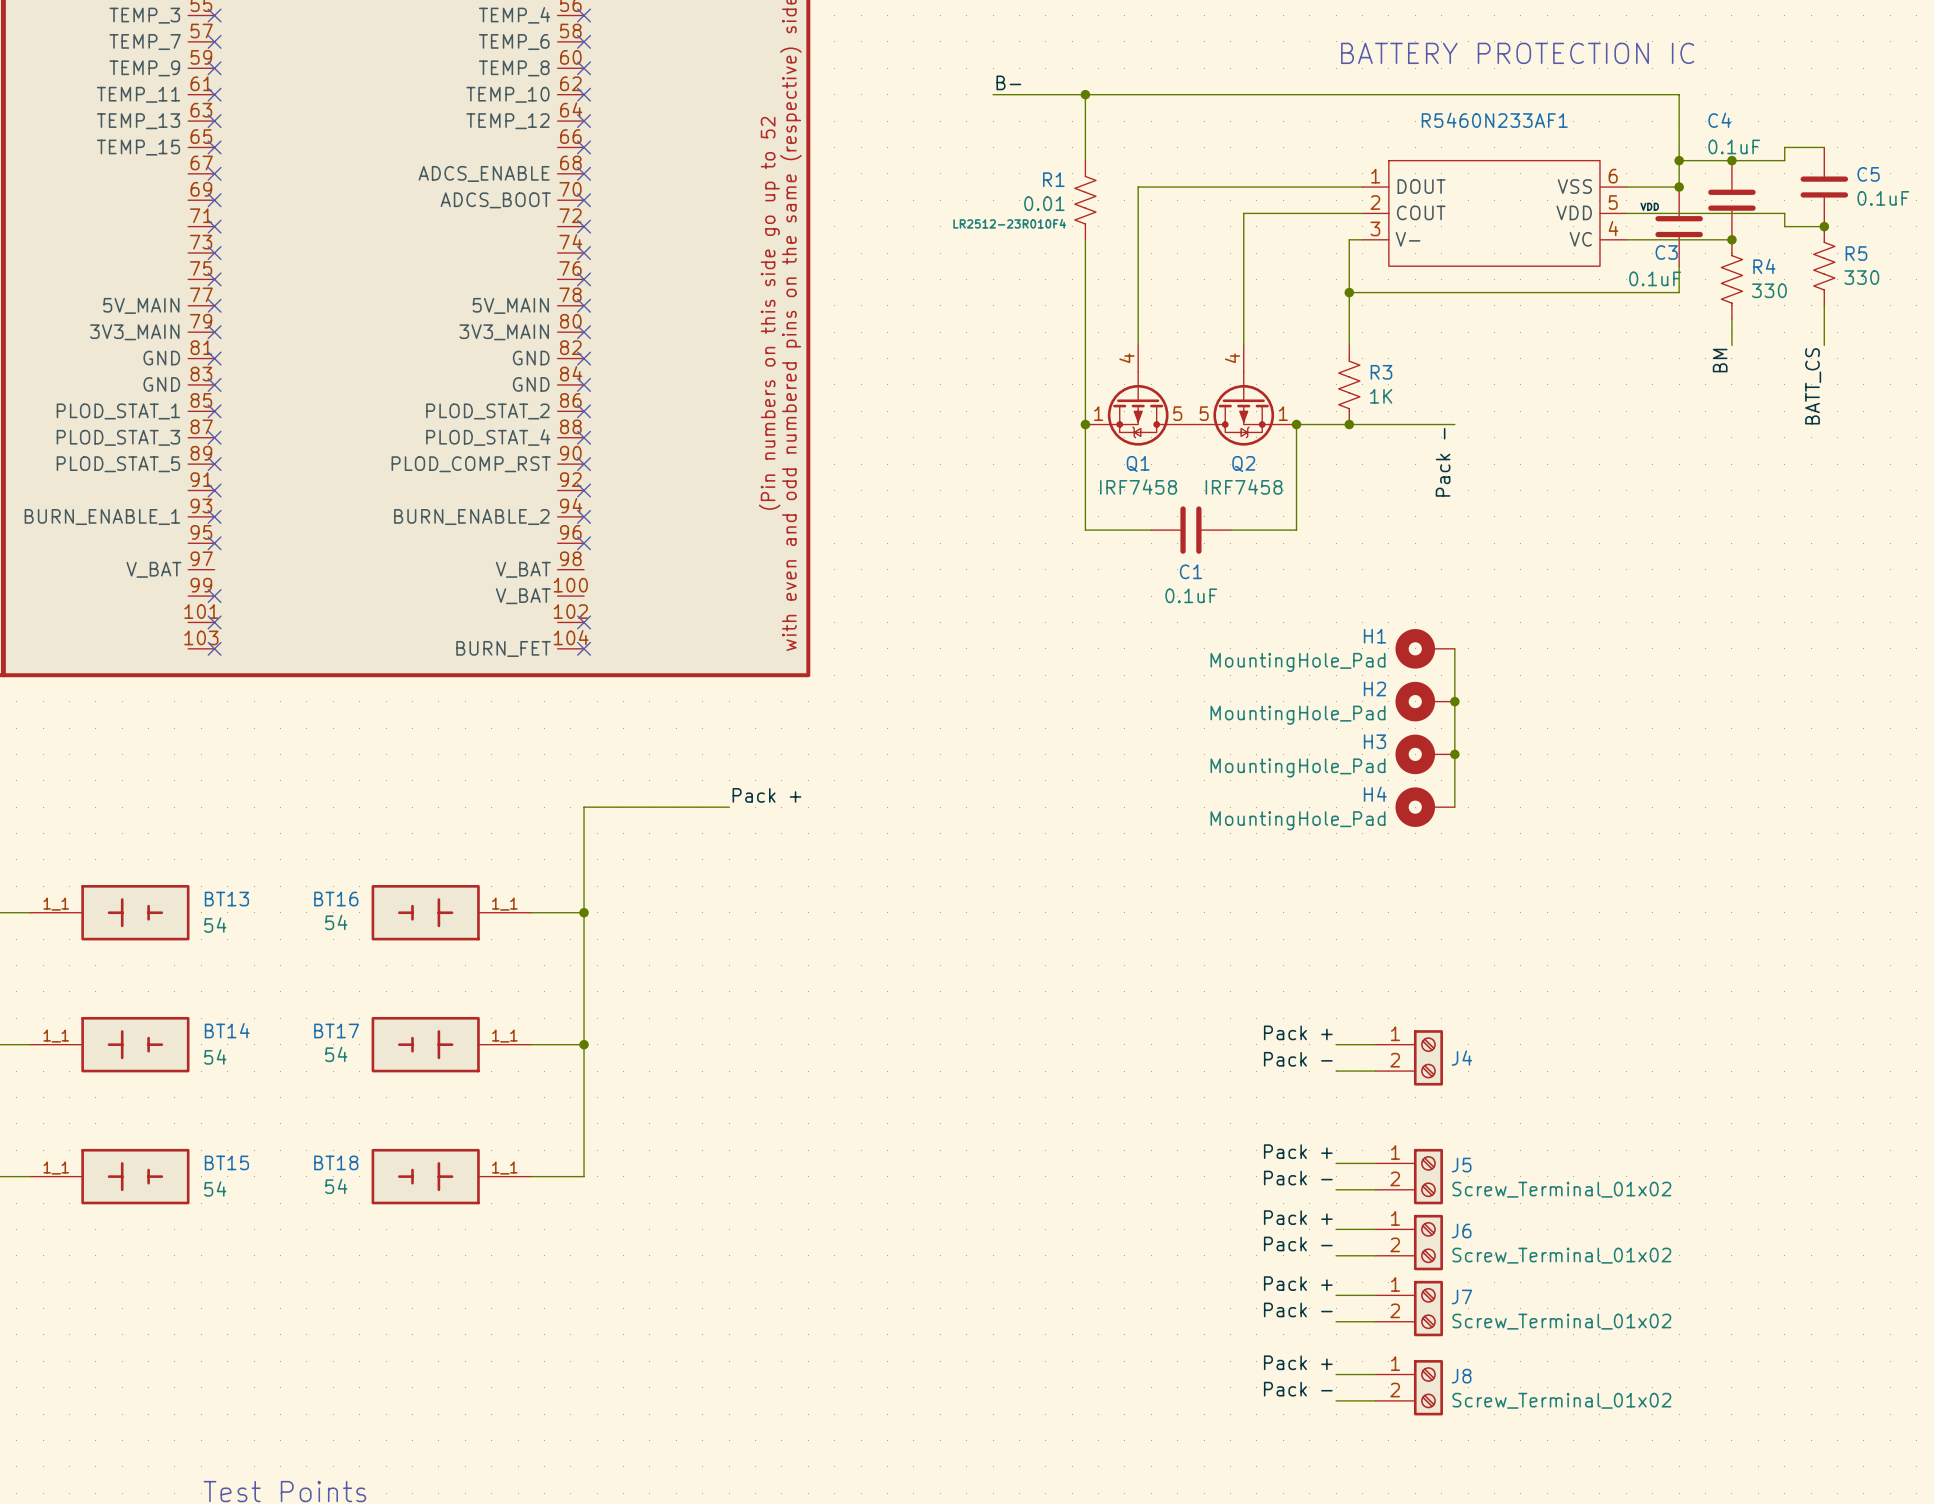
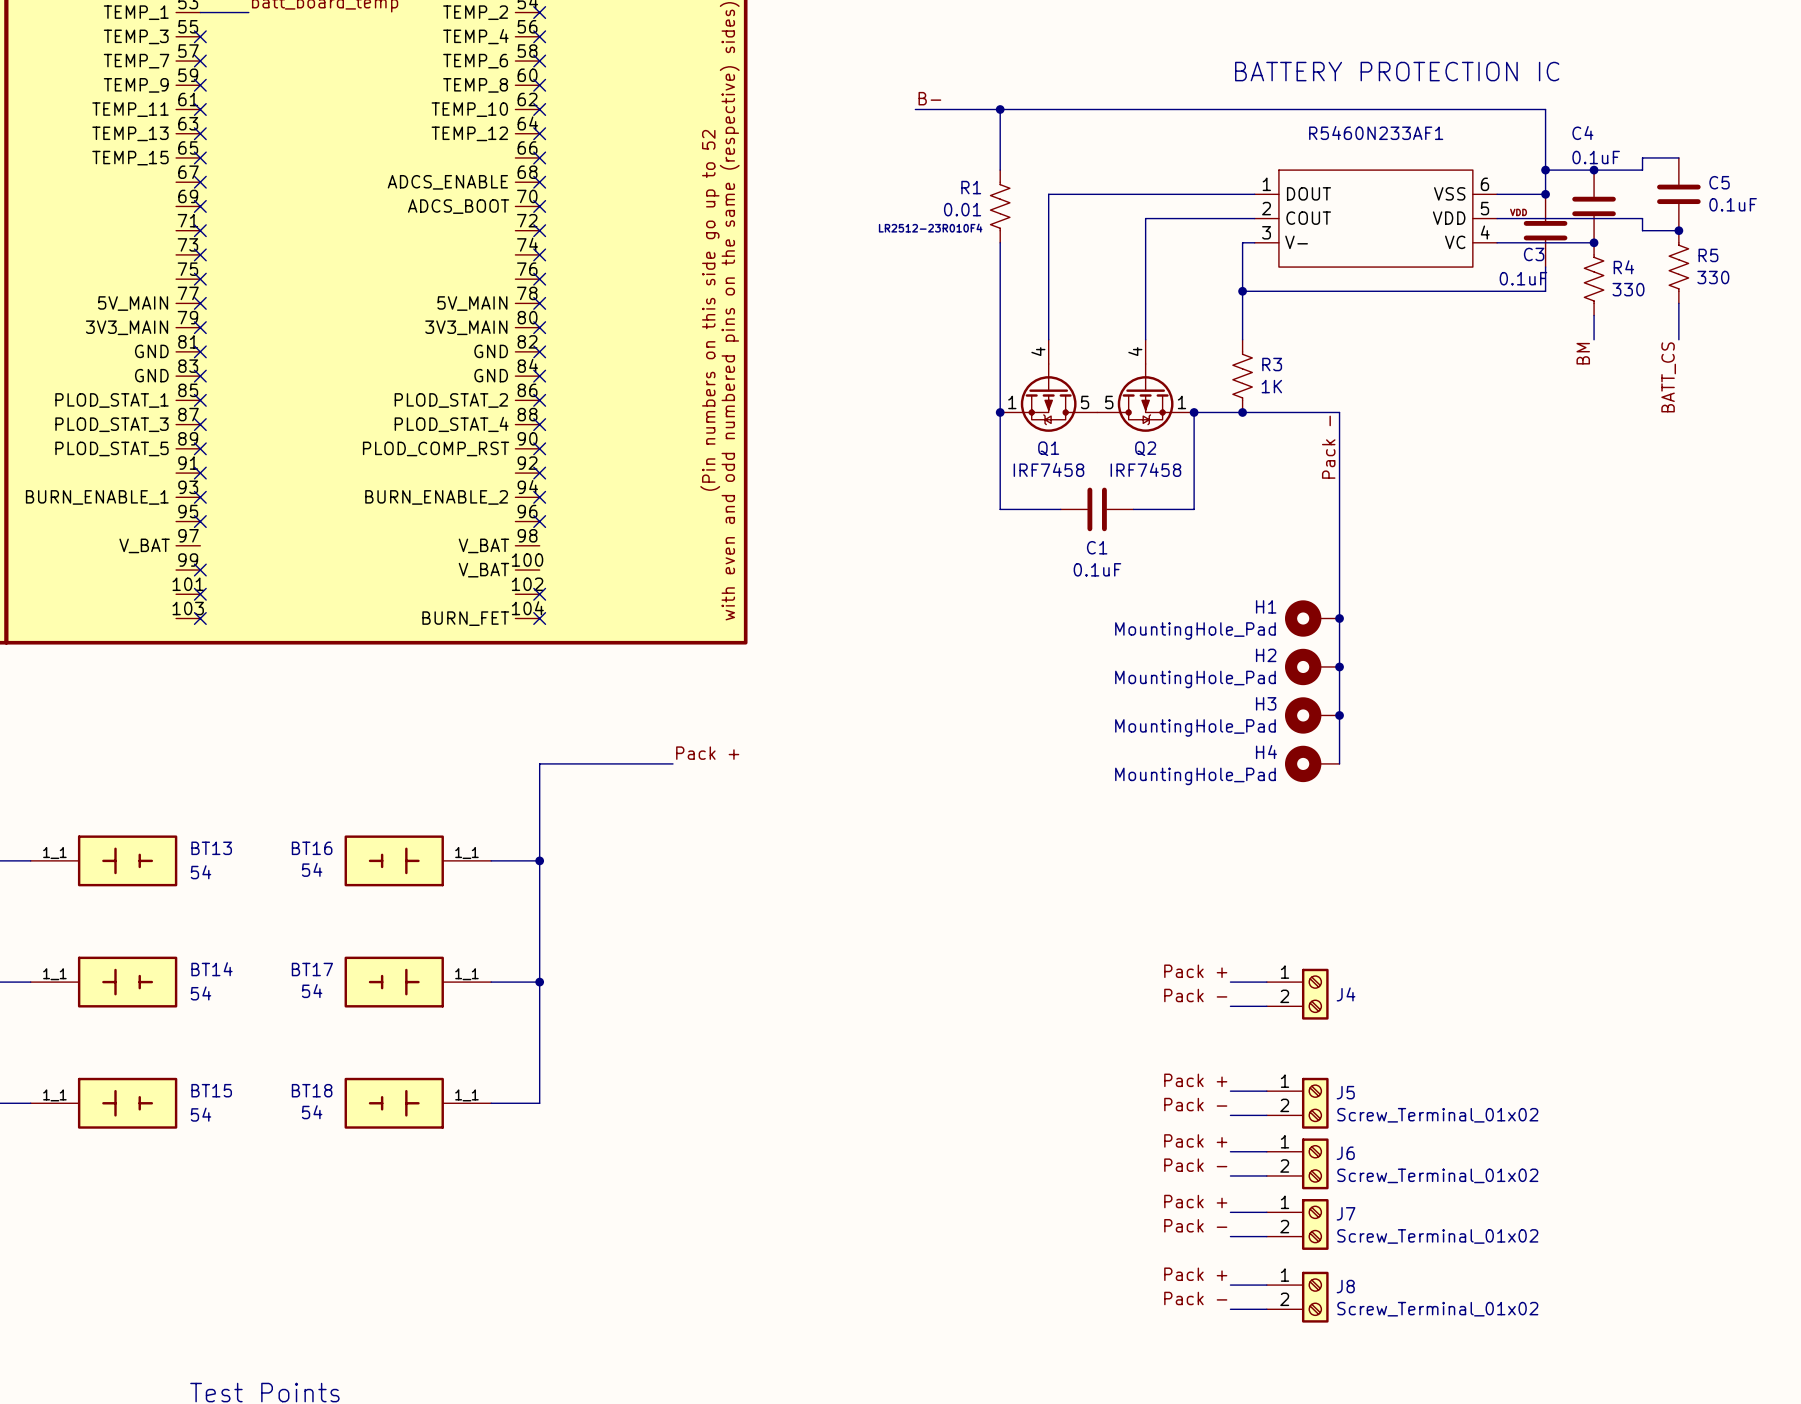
wire: none -> (1339, 412) (1339, 618)
junction: none -> (1339, 618)

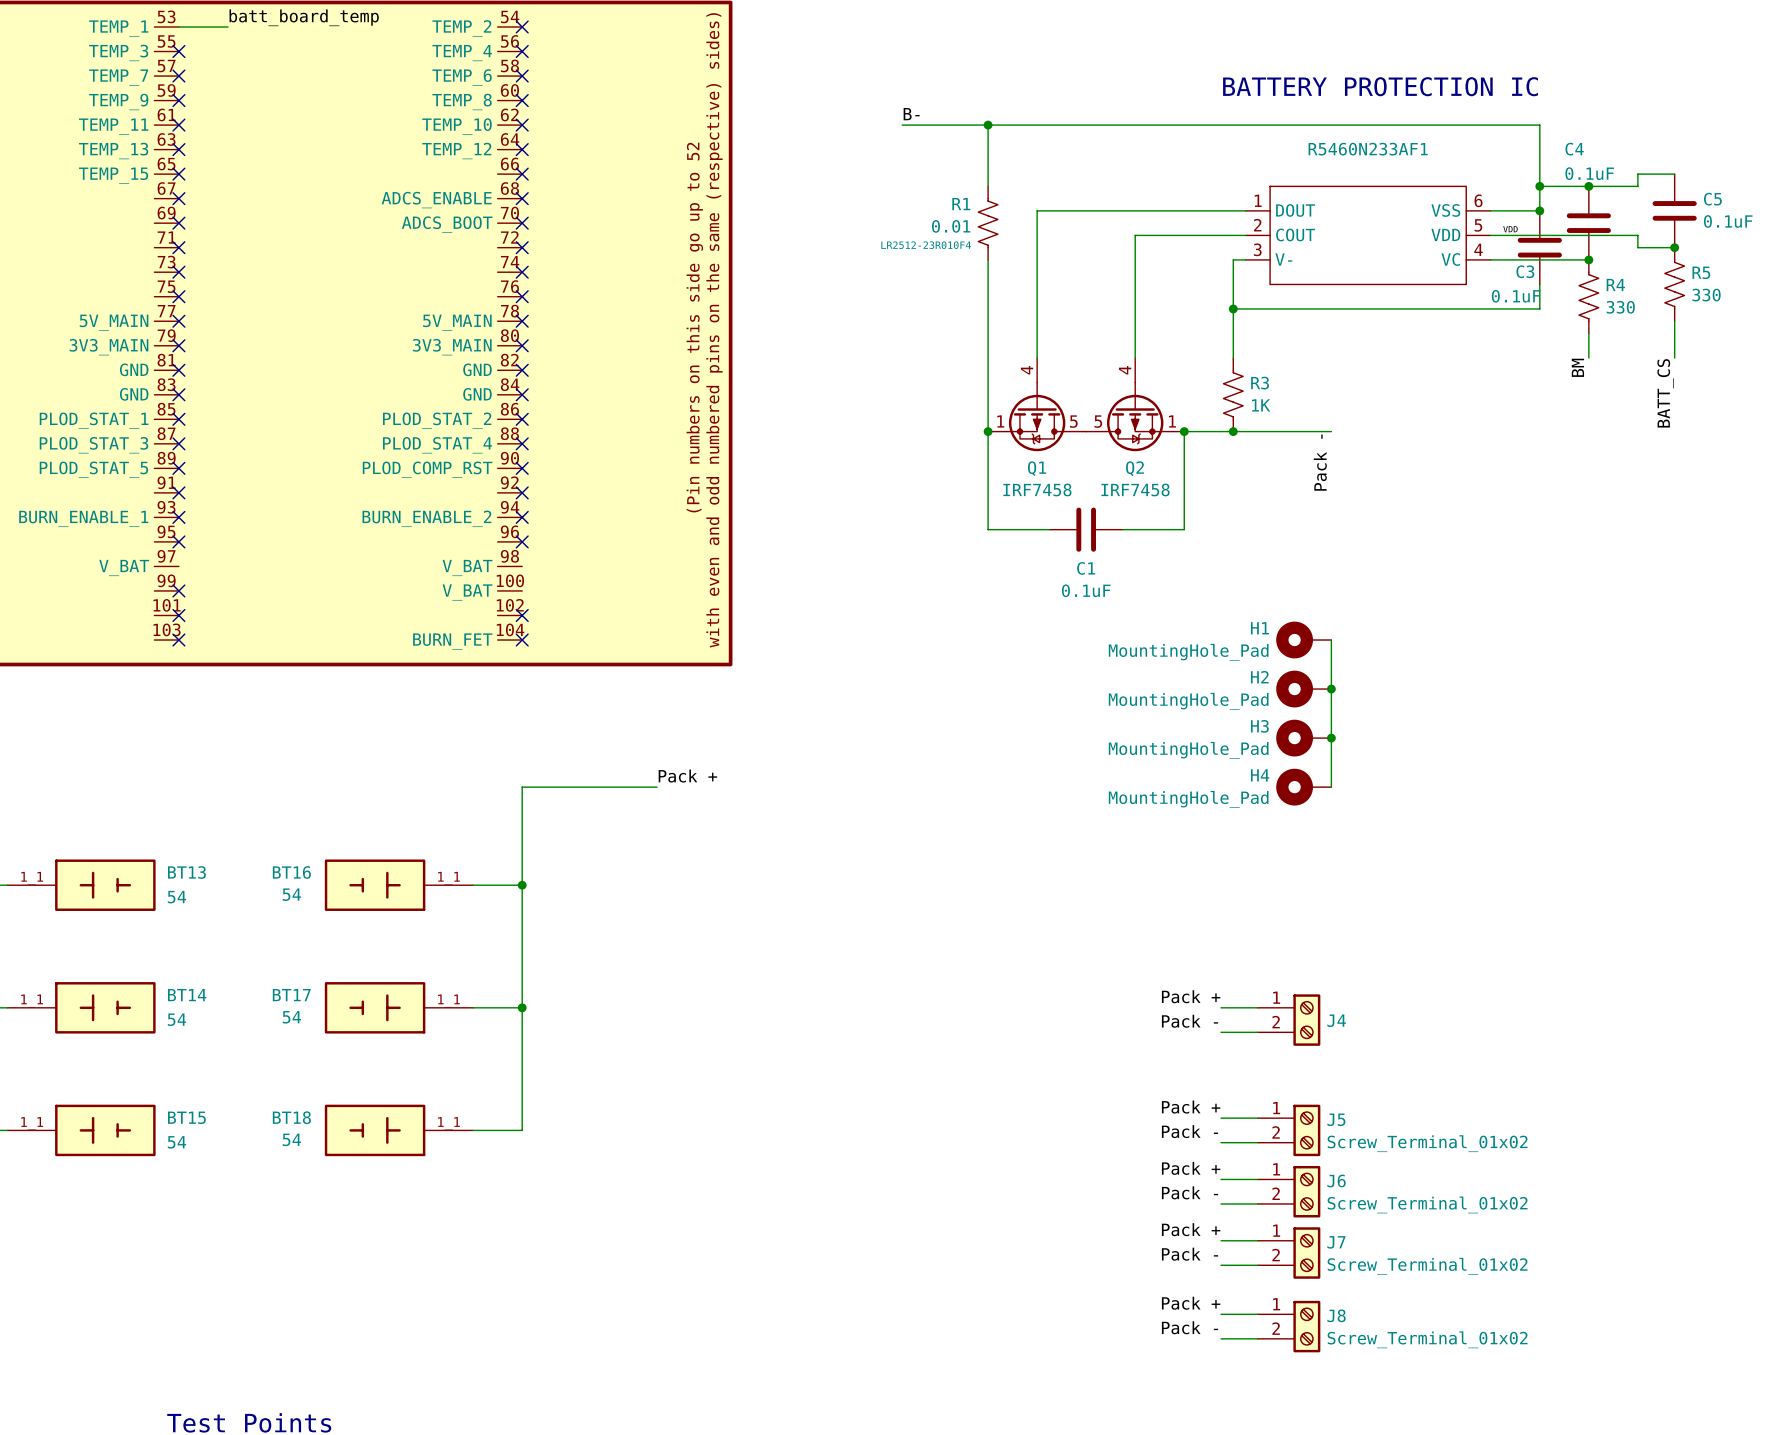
wire: (1339, 412) (1339, 618) -> none
junction: (1339, 618) -> none

